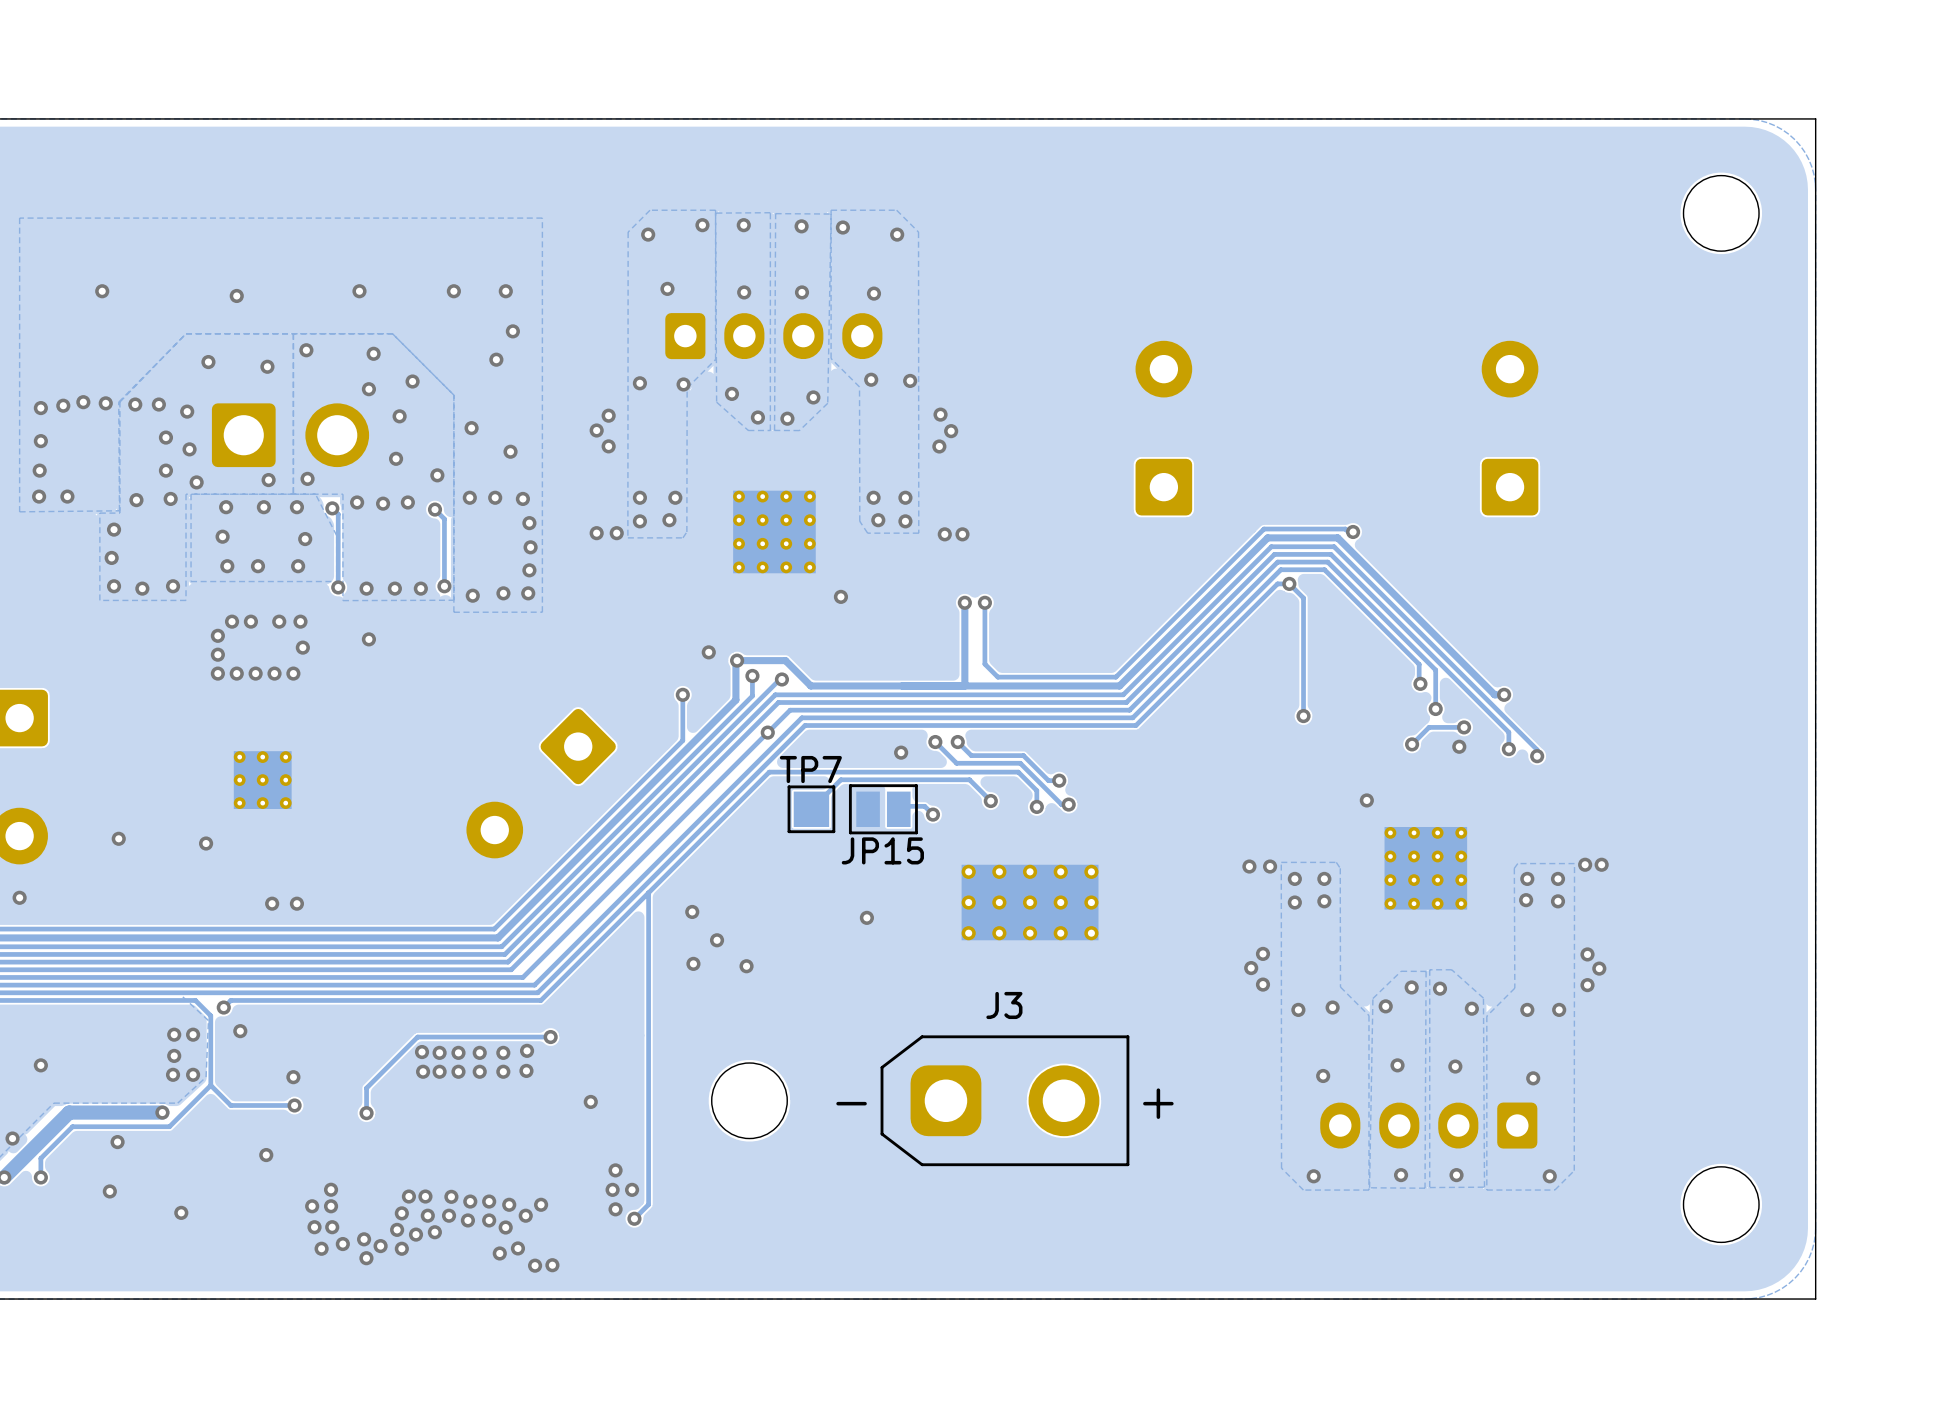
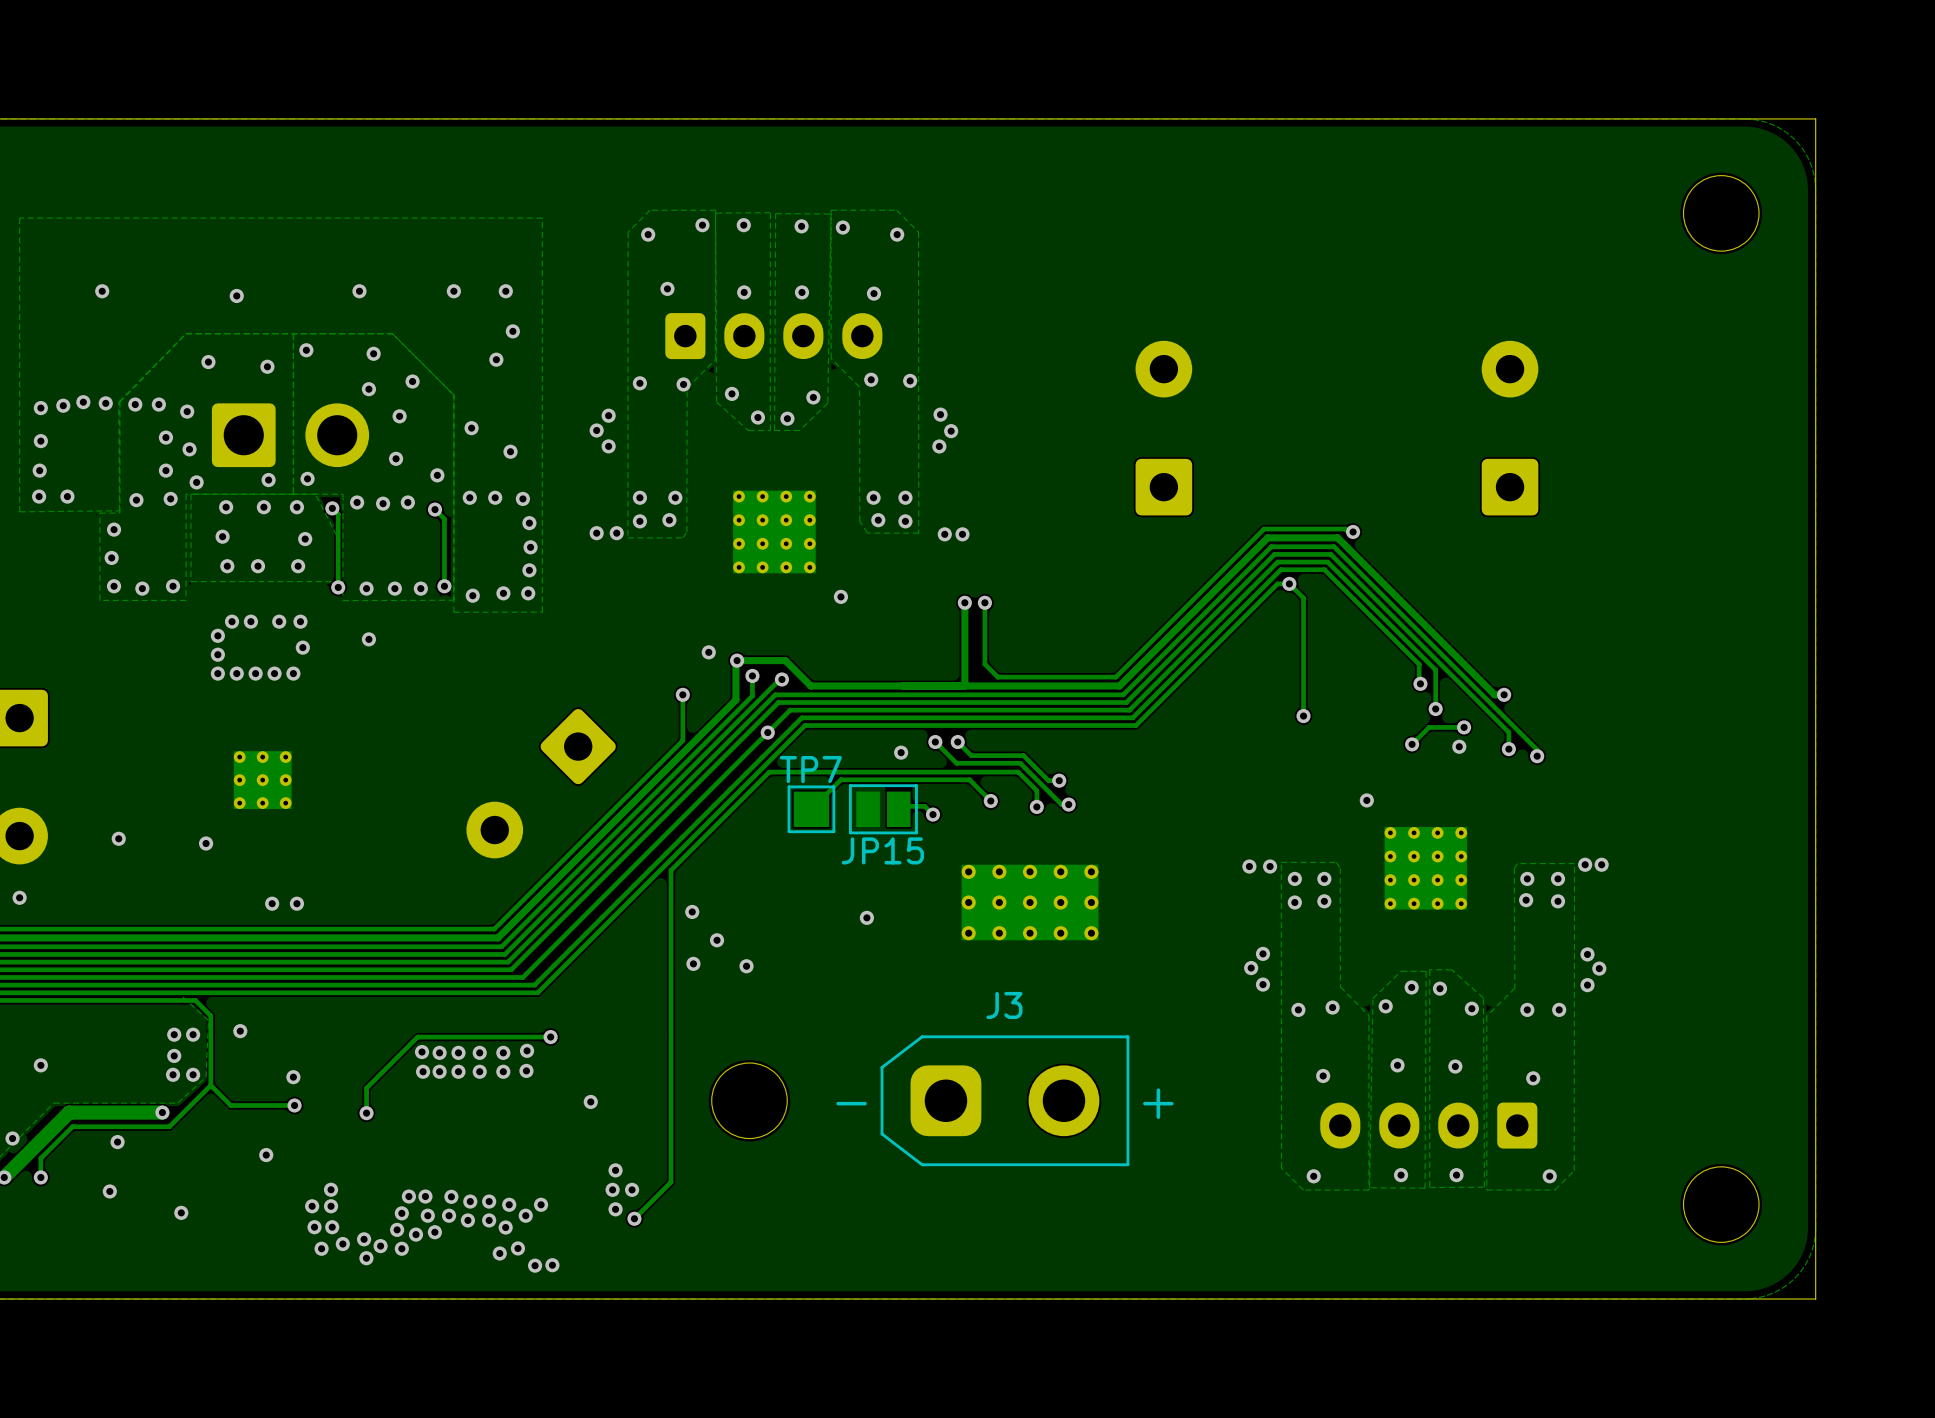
track: (671, 870) (540, 1000) (230, 1000) (223, 1007) -> none
track: (648, 892) (648, 1204) -> (671, 870) (671, 1182) (648, 1204)
via: (223, 1007) -> none

